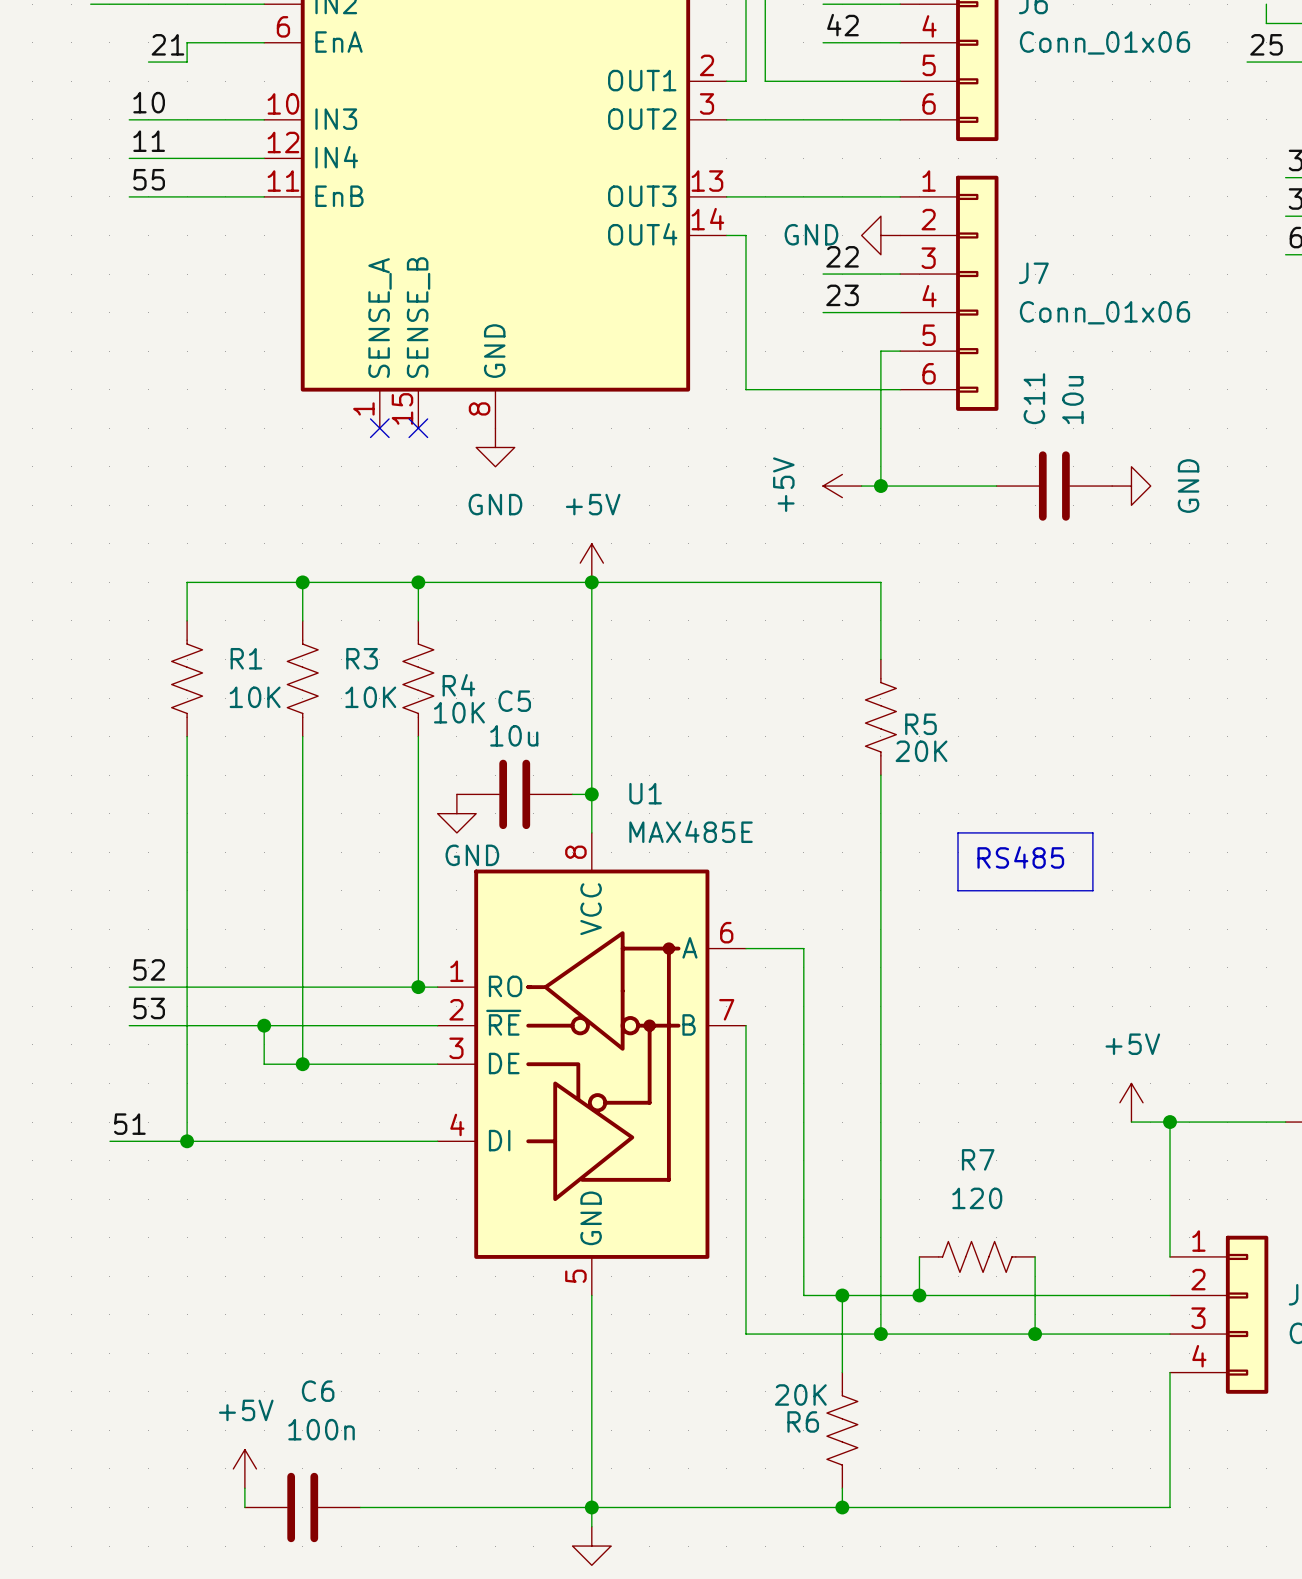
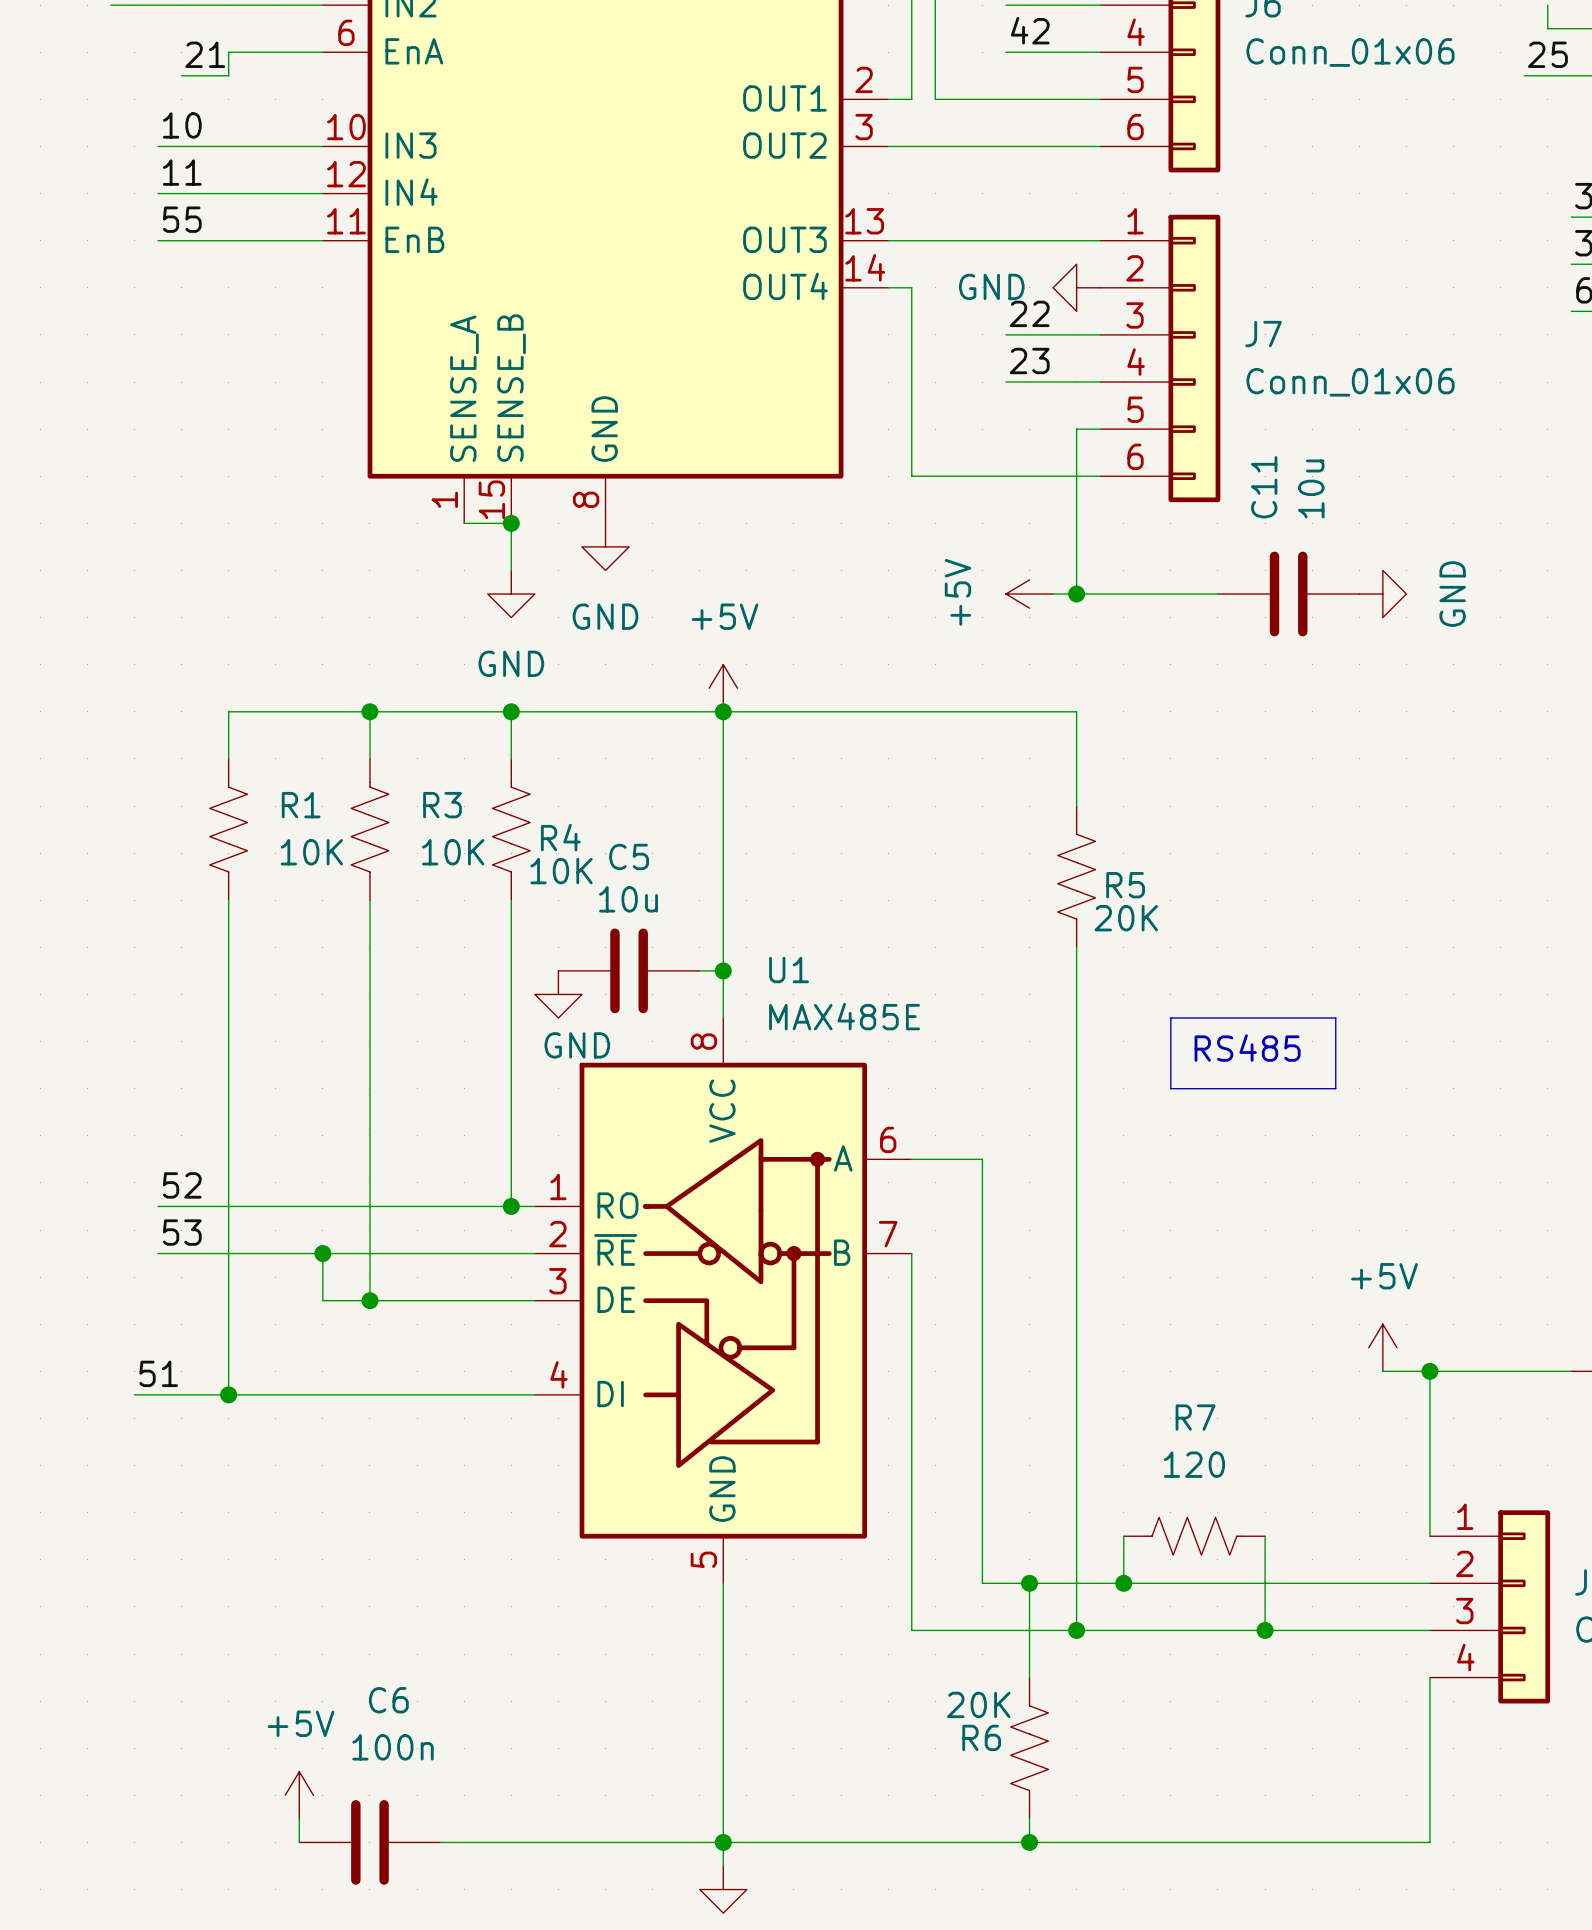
wire: none -> (464, 523) (511, 523) (511, 570)
no-connect mark: (379, 428) -> none
no-connect mark: (418, 428) -> none
junction: none -> (511, 523)
power symbol: none -> GND (511, 594)

